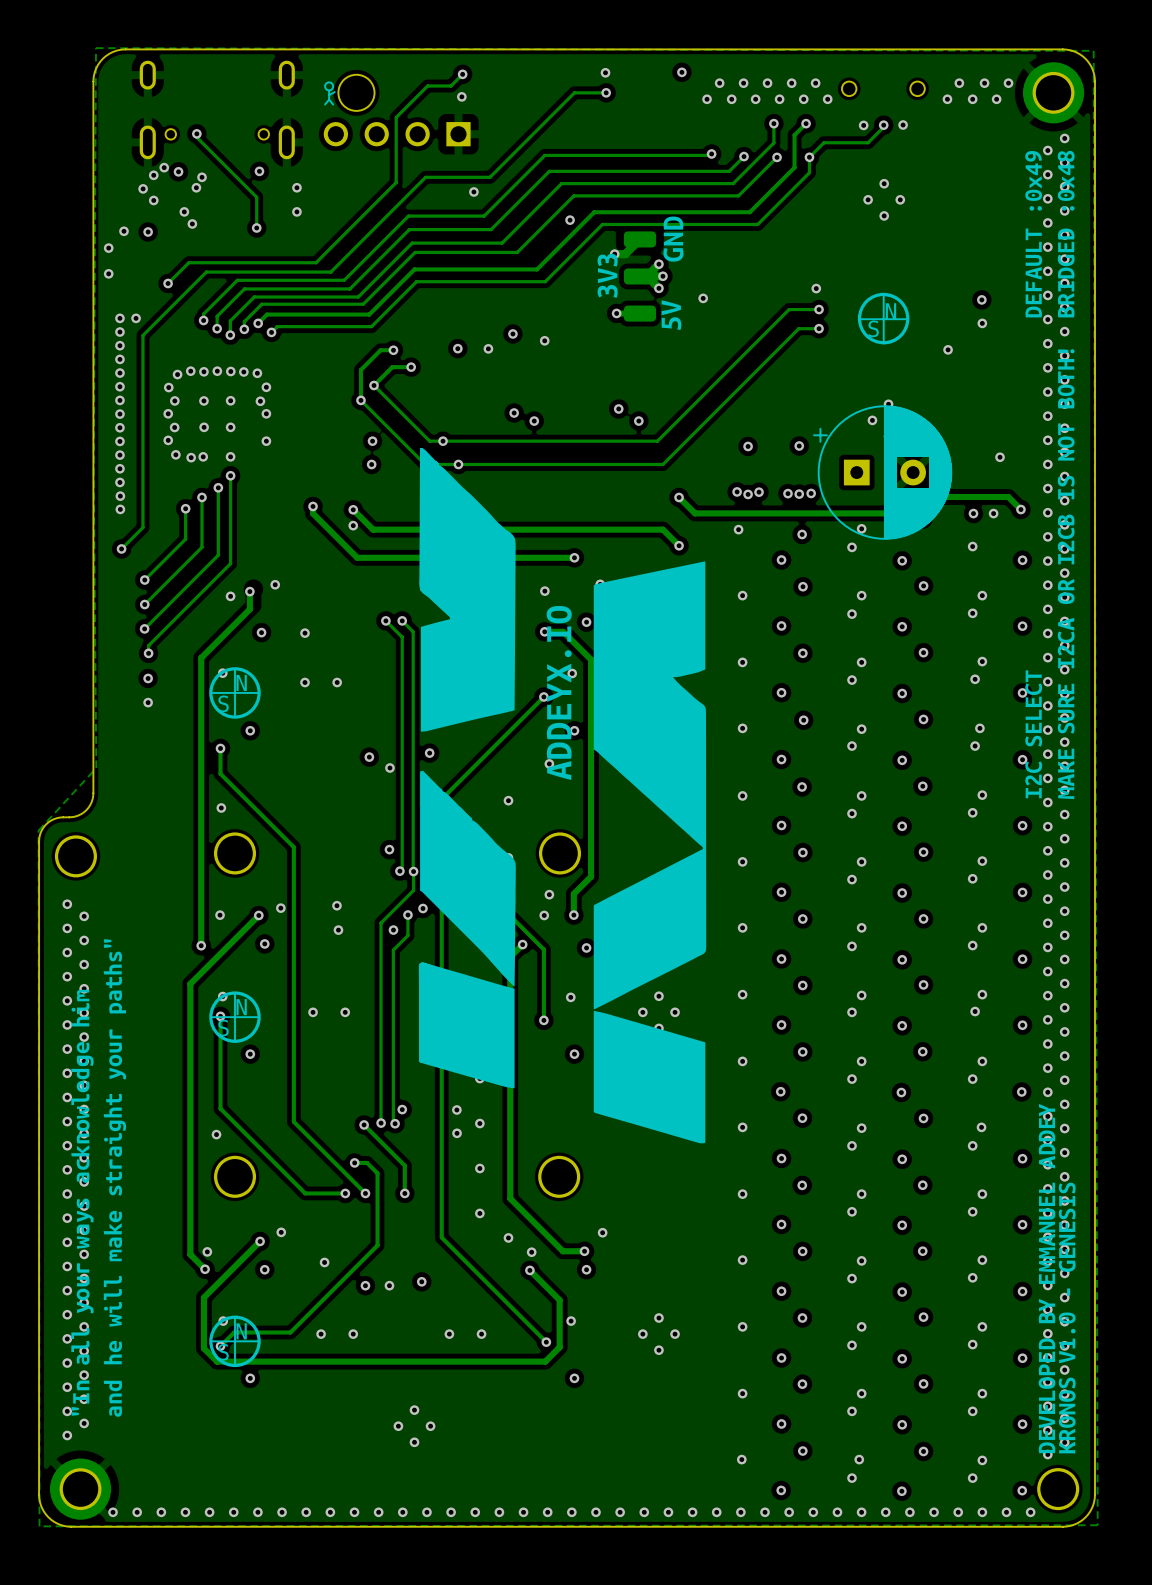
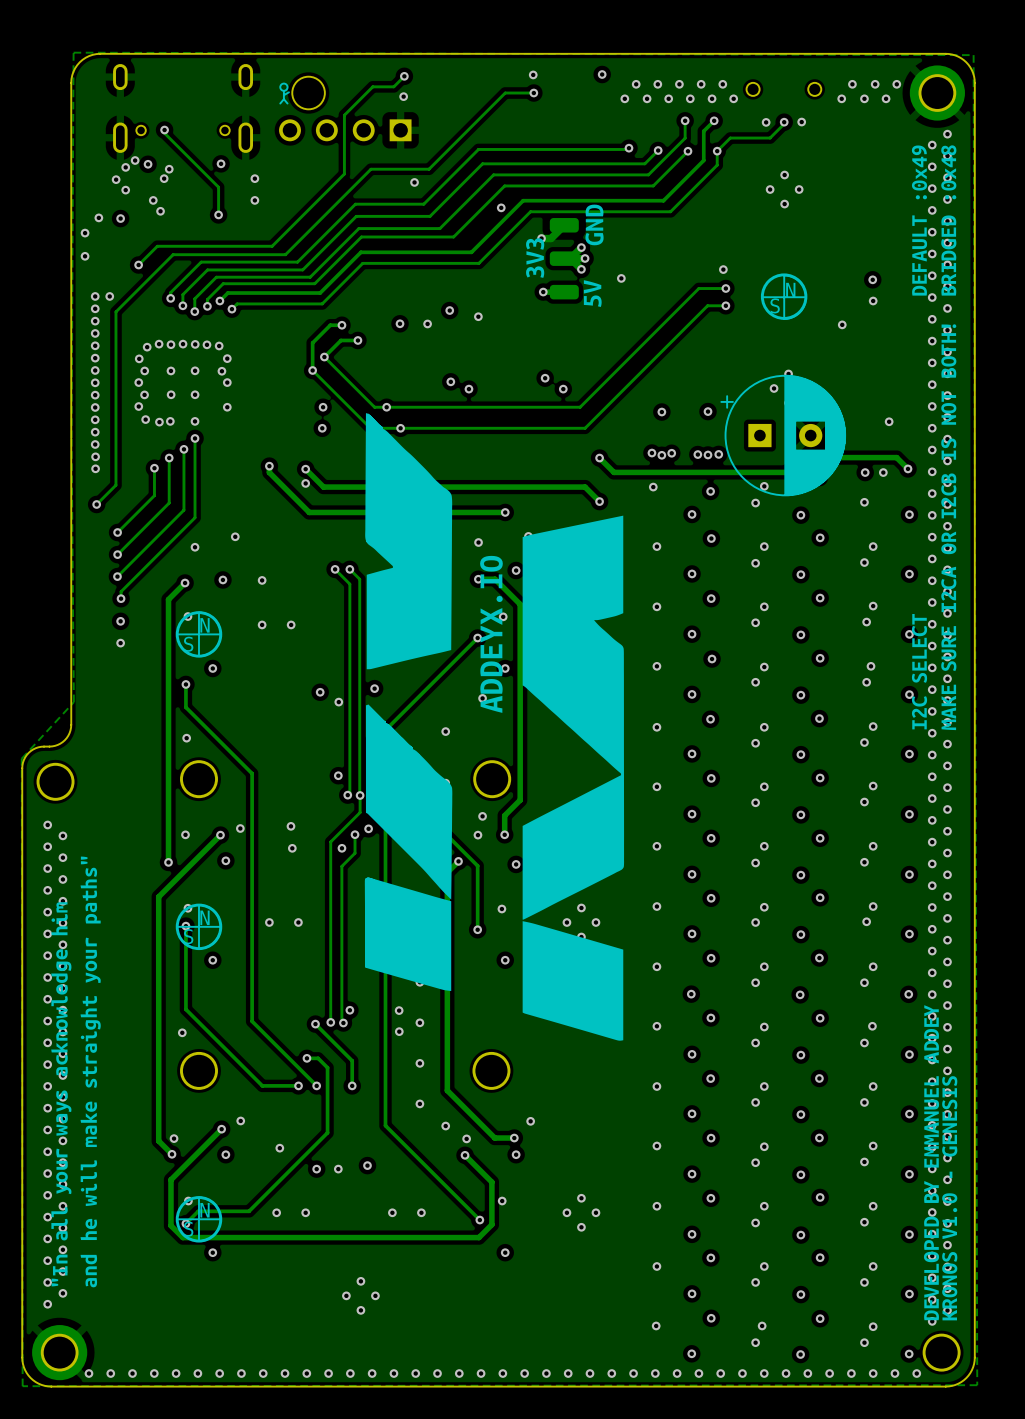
track: (249, 591) (249, 609) (201, 657) -> (185, 583) (168, 599) (168, 602)
via position: (249, 591) -> (185, 583)

